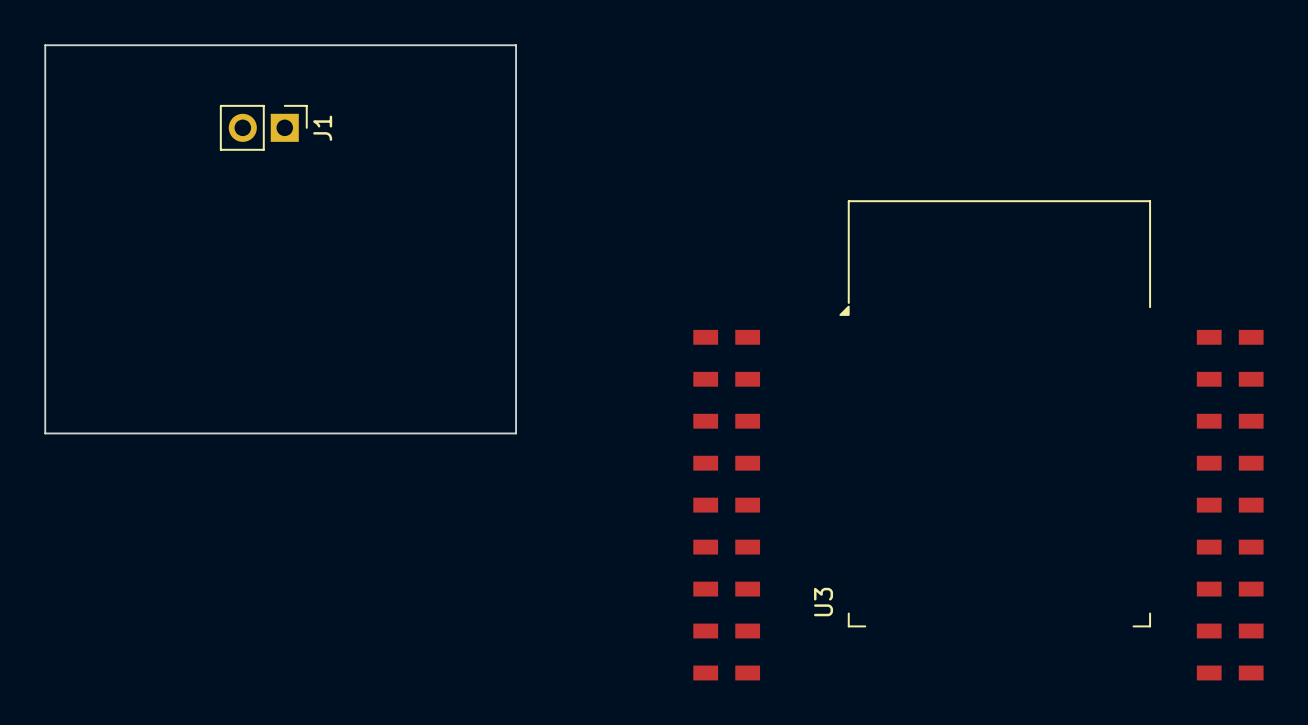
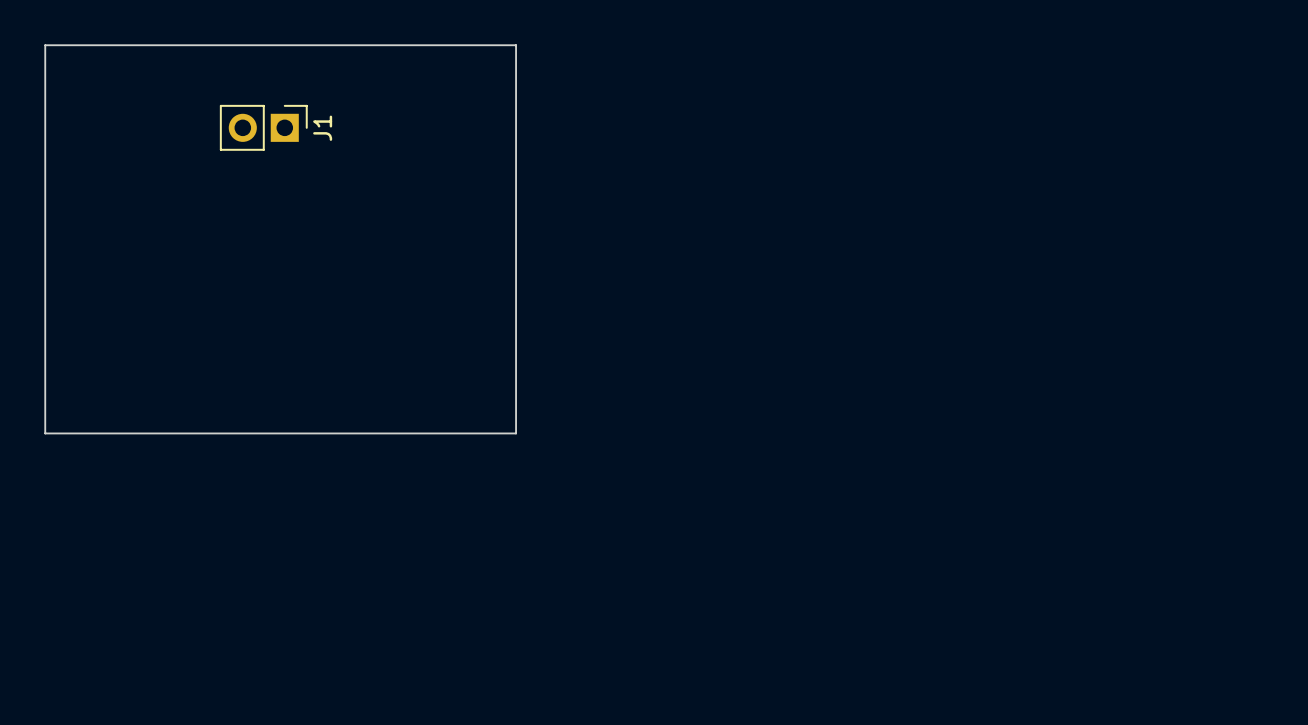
U3: (978, 440) -> none

